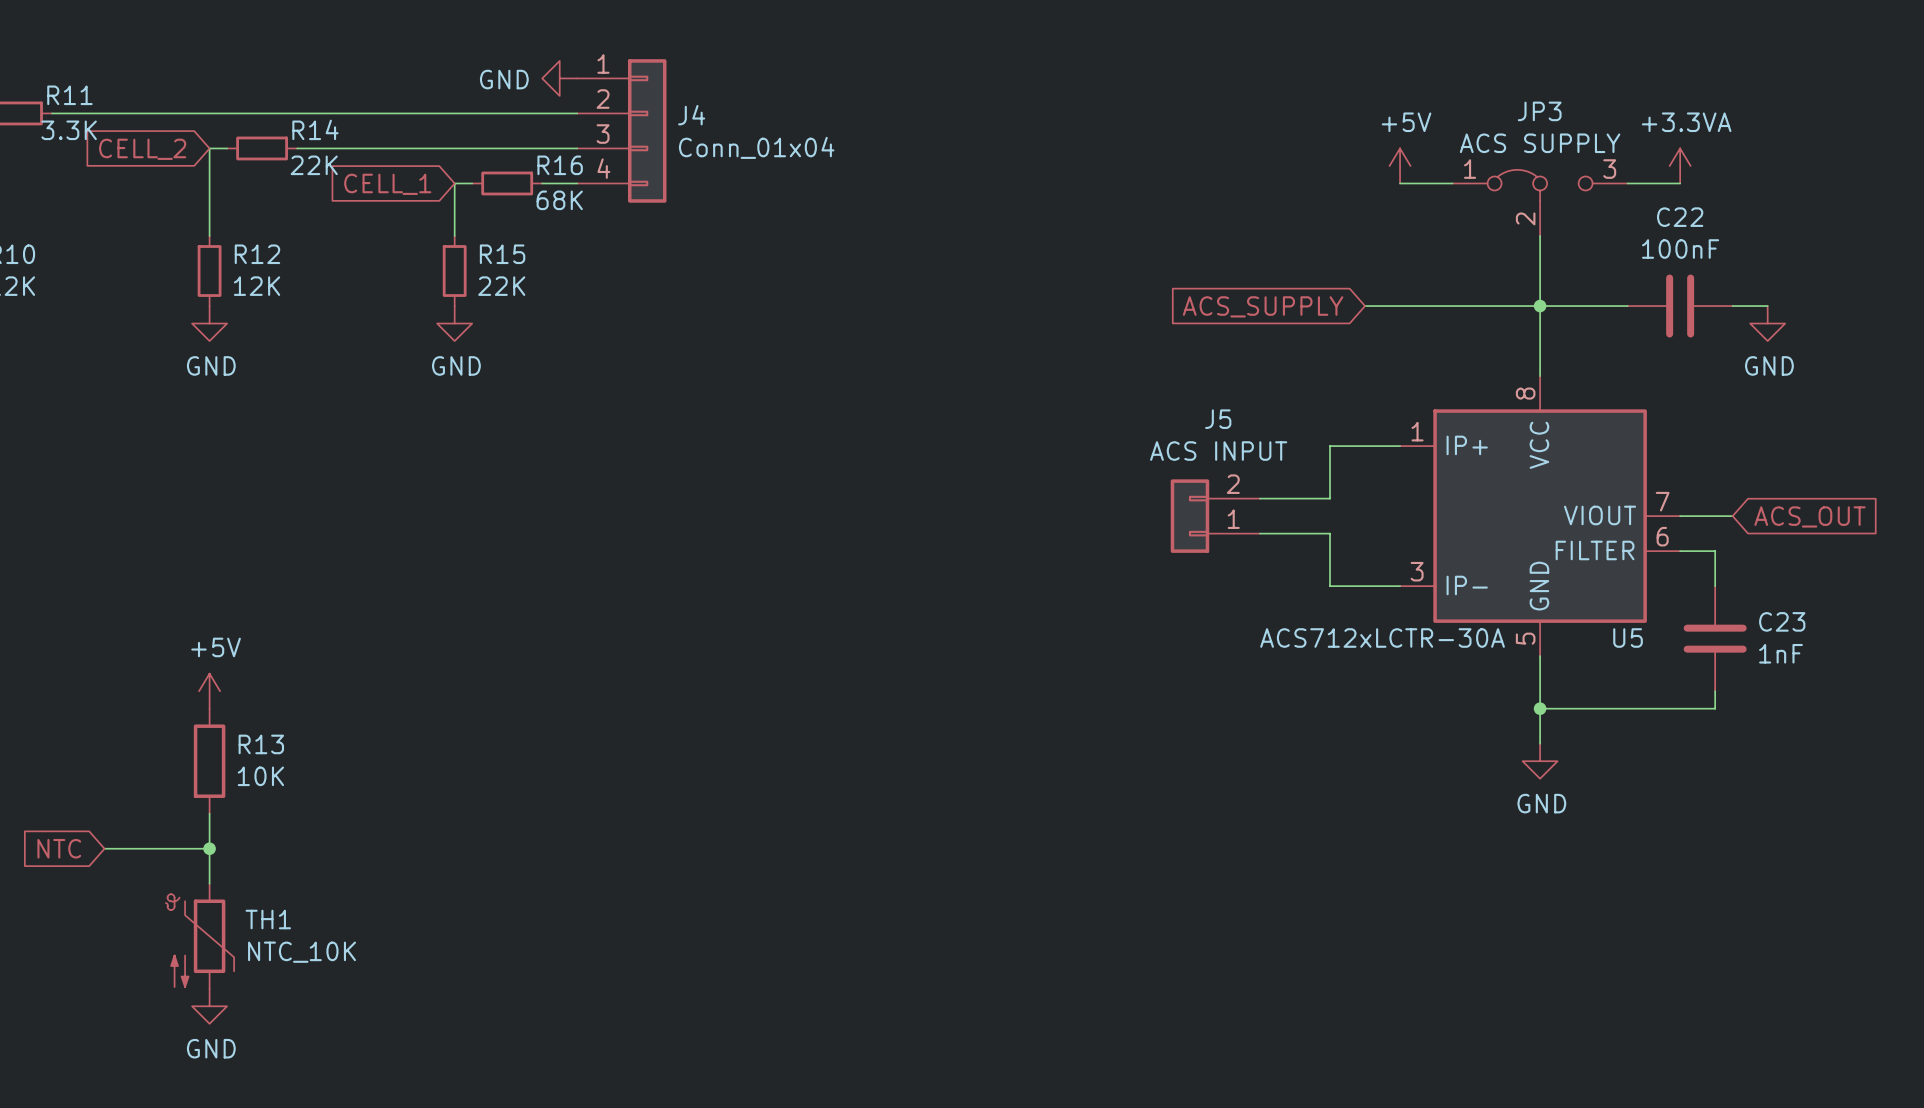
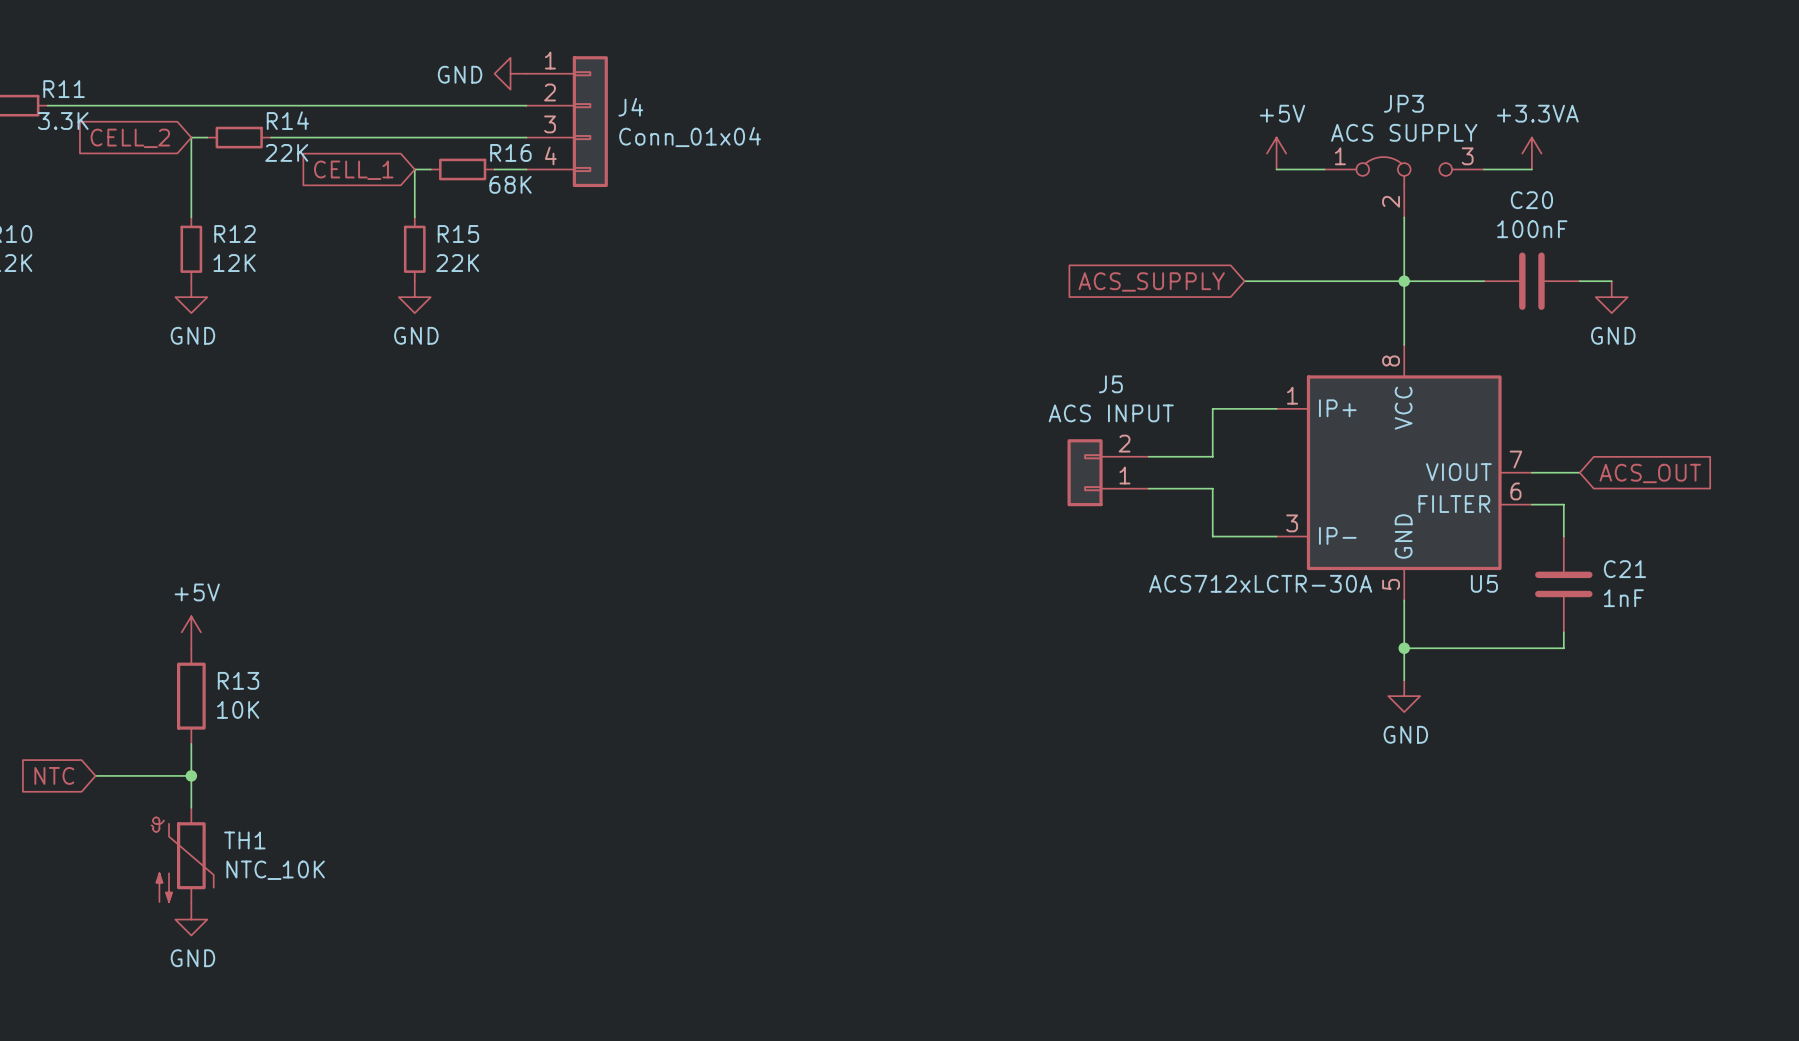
C22 name: C22 (1680, 217) -> C20 (1531, 200)
C23 name: C23 (1782, 621) -> C21 (1624, 569)

